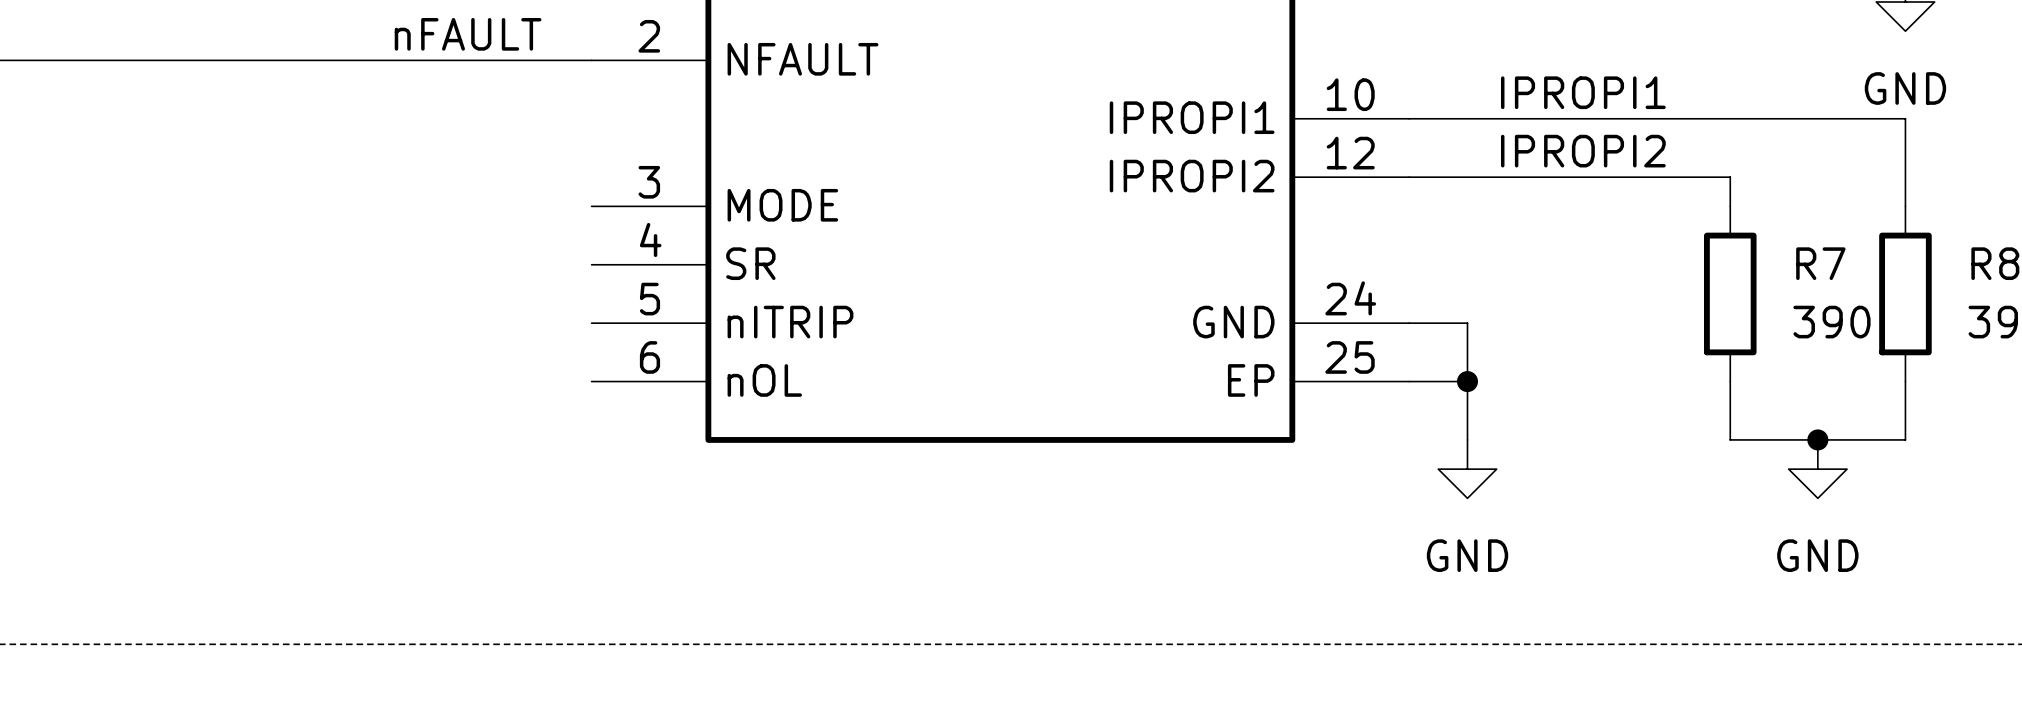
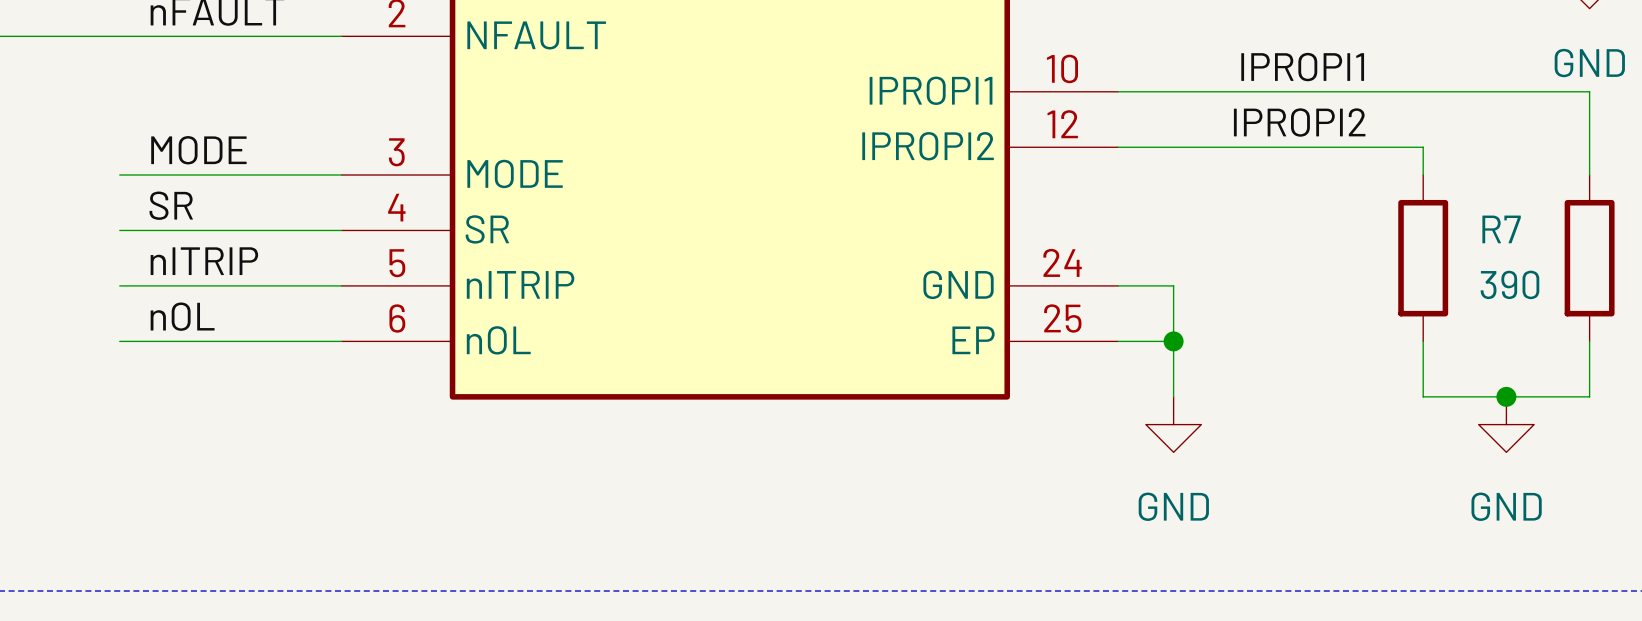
label: none -> MODE (198, 150)
wire: none -> (119, 175) (341, 175)
label: none -> SR (171, 205)
wire: none -> (119, 230) (341, 230)
label: none -> nITRIP (204, 261)
wire: none -> (119, 285) (341, 285)
label: none -> nOL (182, 316)
wire: none -> (119, 341) (341, 341)

